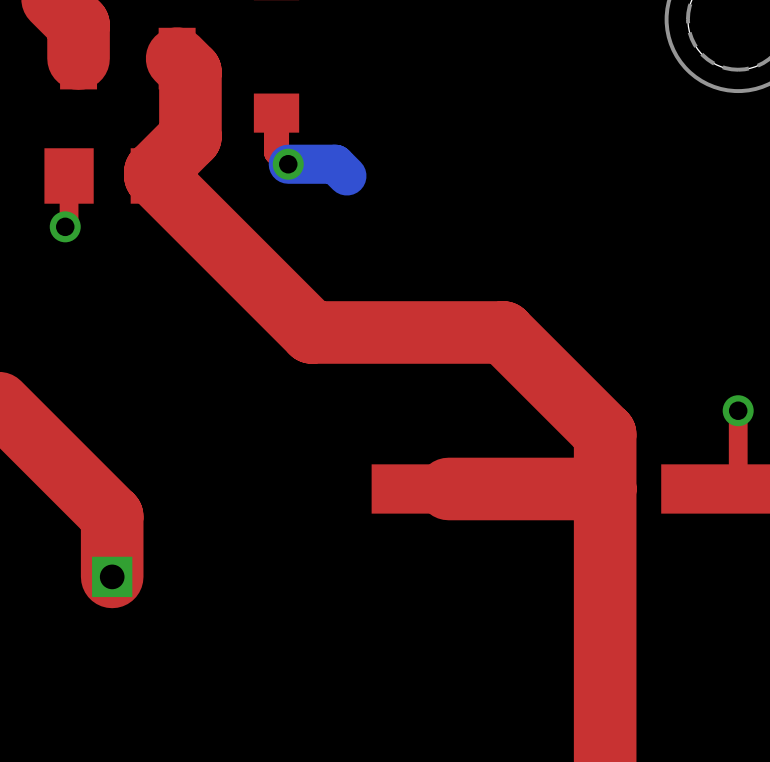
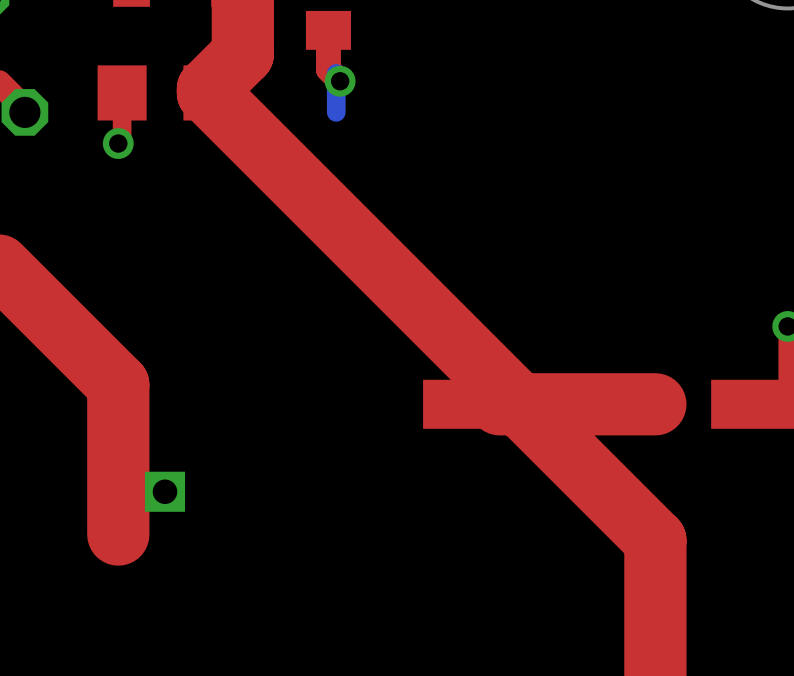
bottom track: none -> (336, 73) (336, 112)
bottom track: (288, 164) (335, 164) (346, 175) -> none
top track: (311, 332) (503, 332) (605, 434) (605, 625) -> (363, 248) (655, 540)
top track: (65, 469) (112, 516) (112, 576) -> (118, 384) (118, 534)

